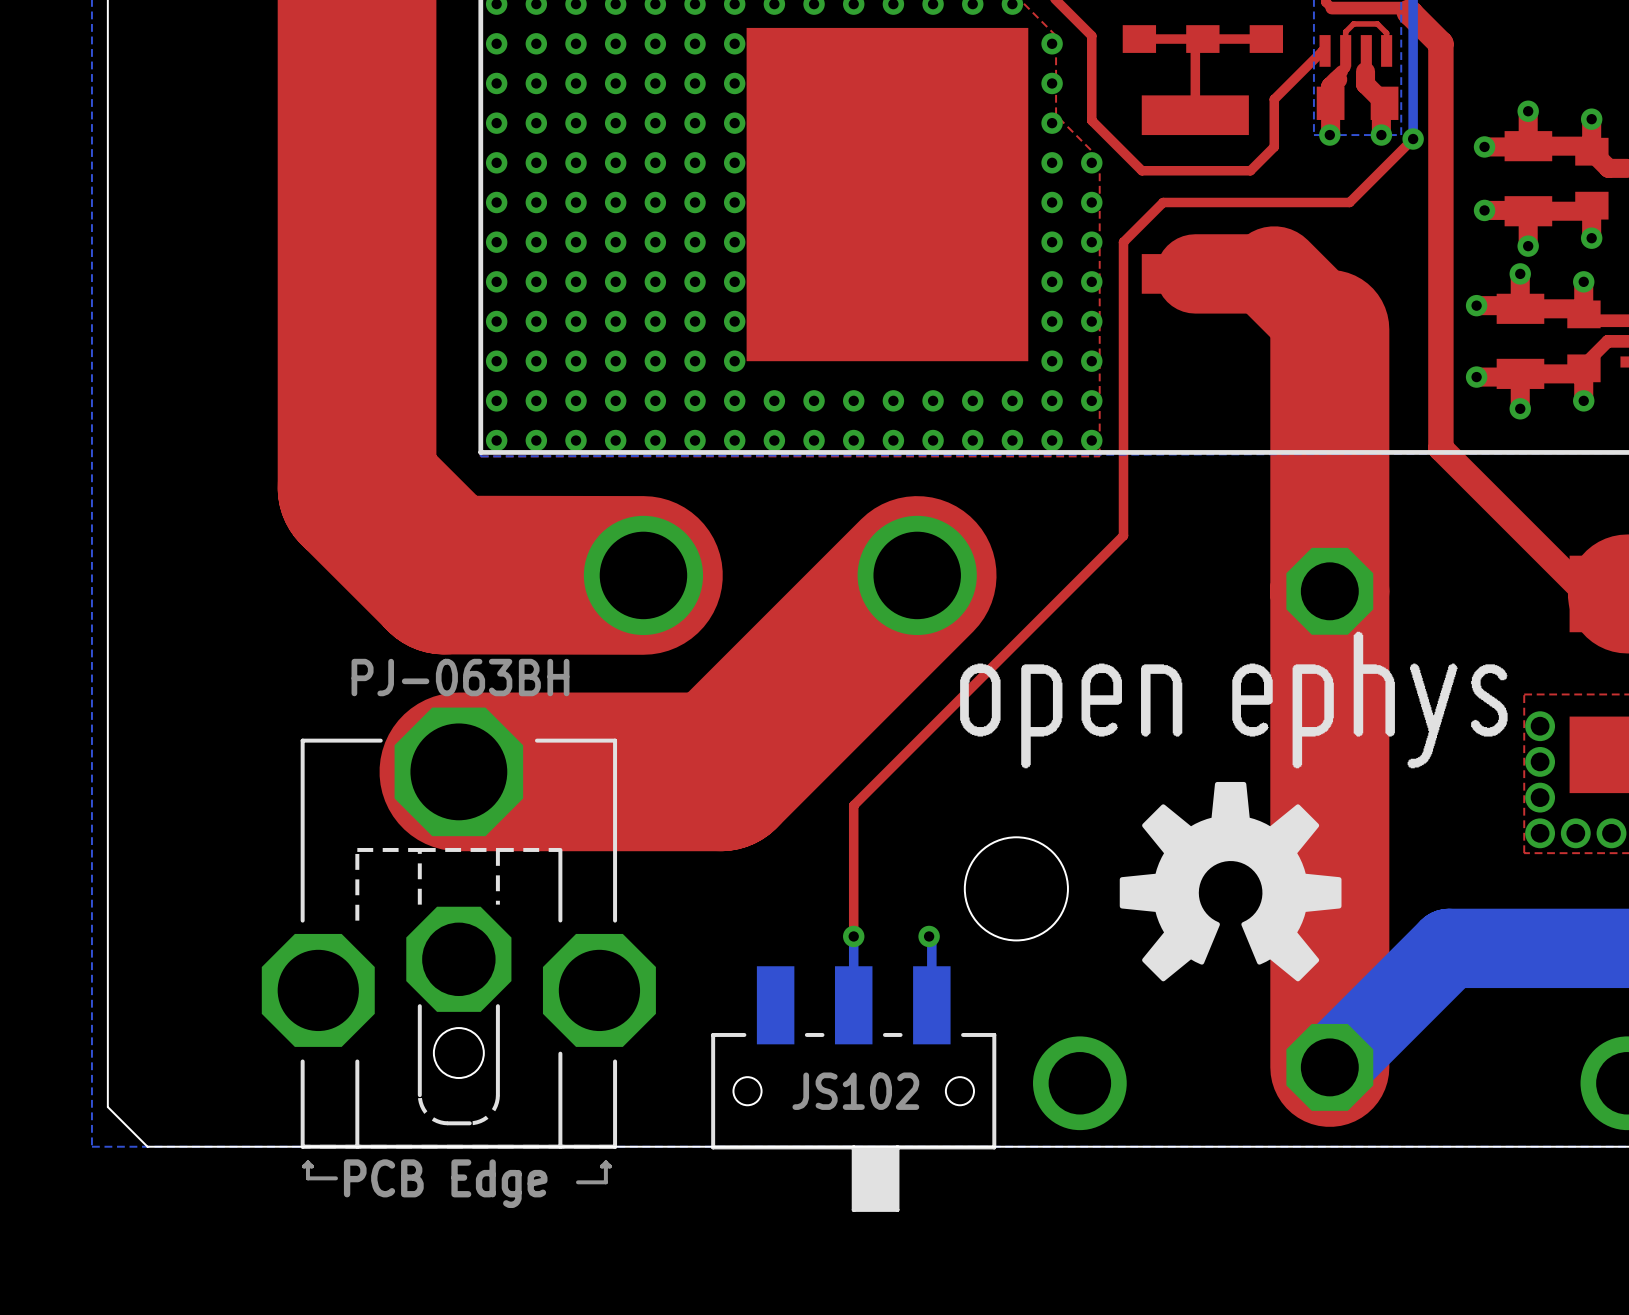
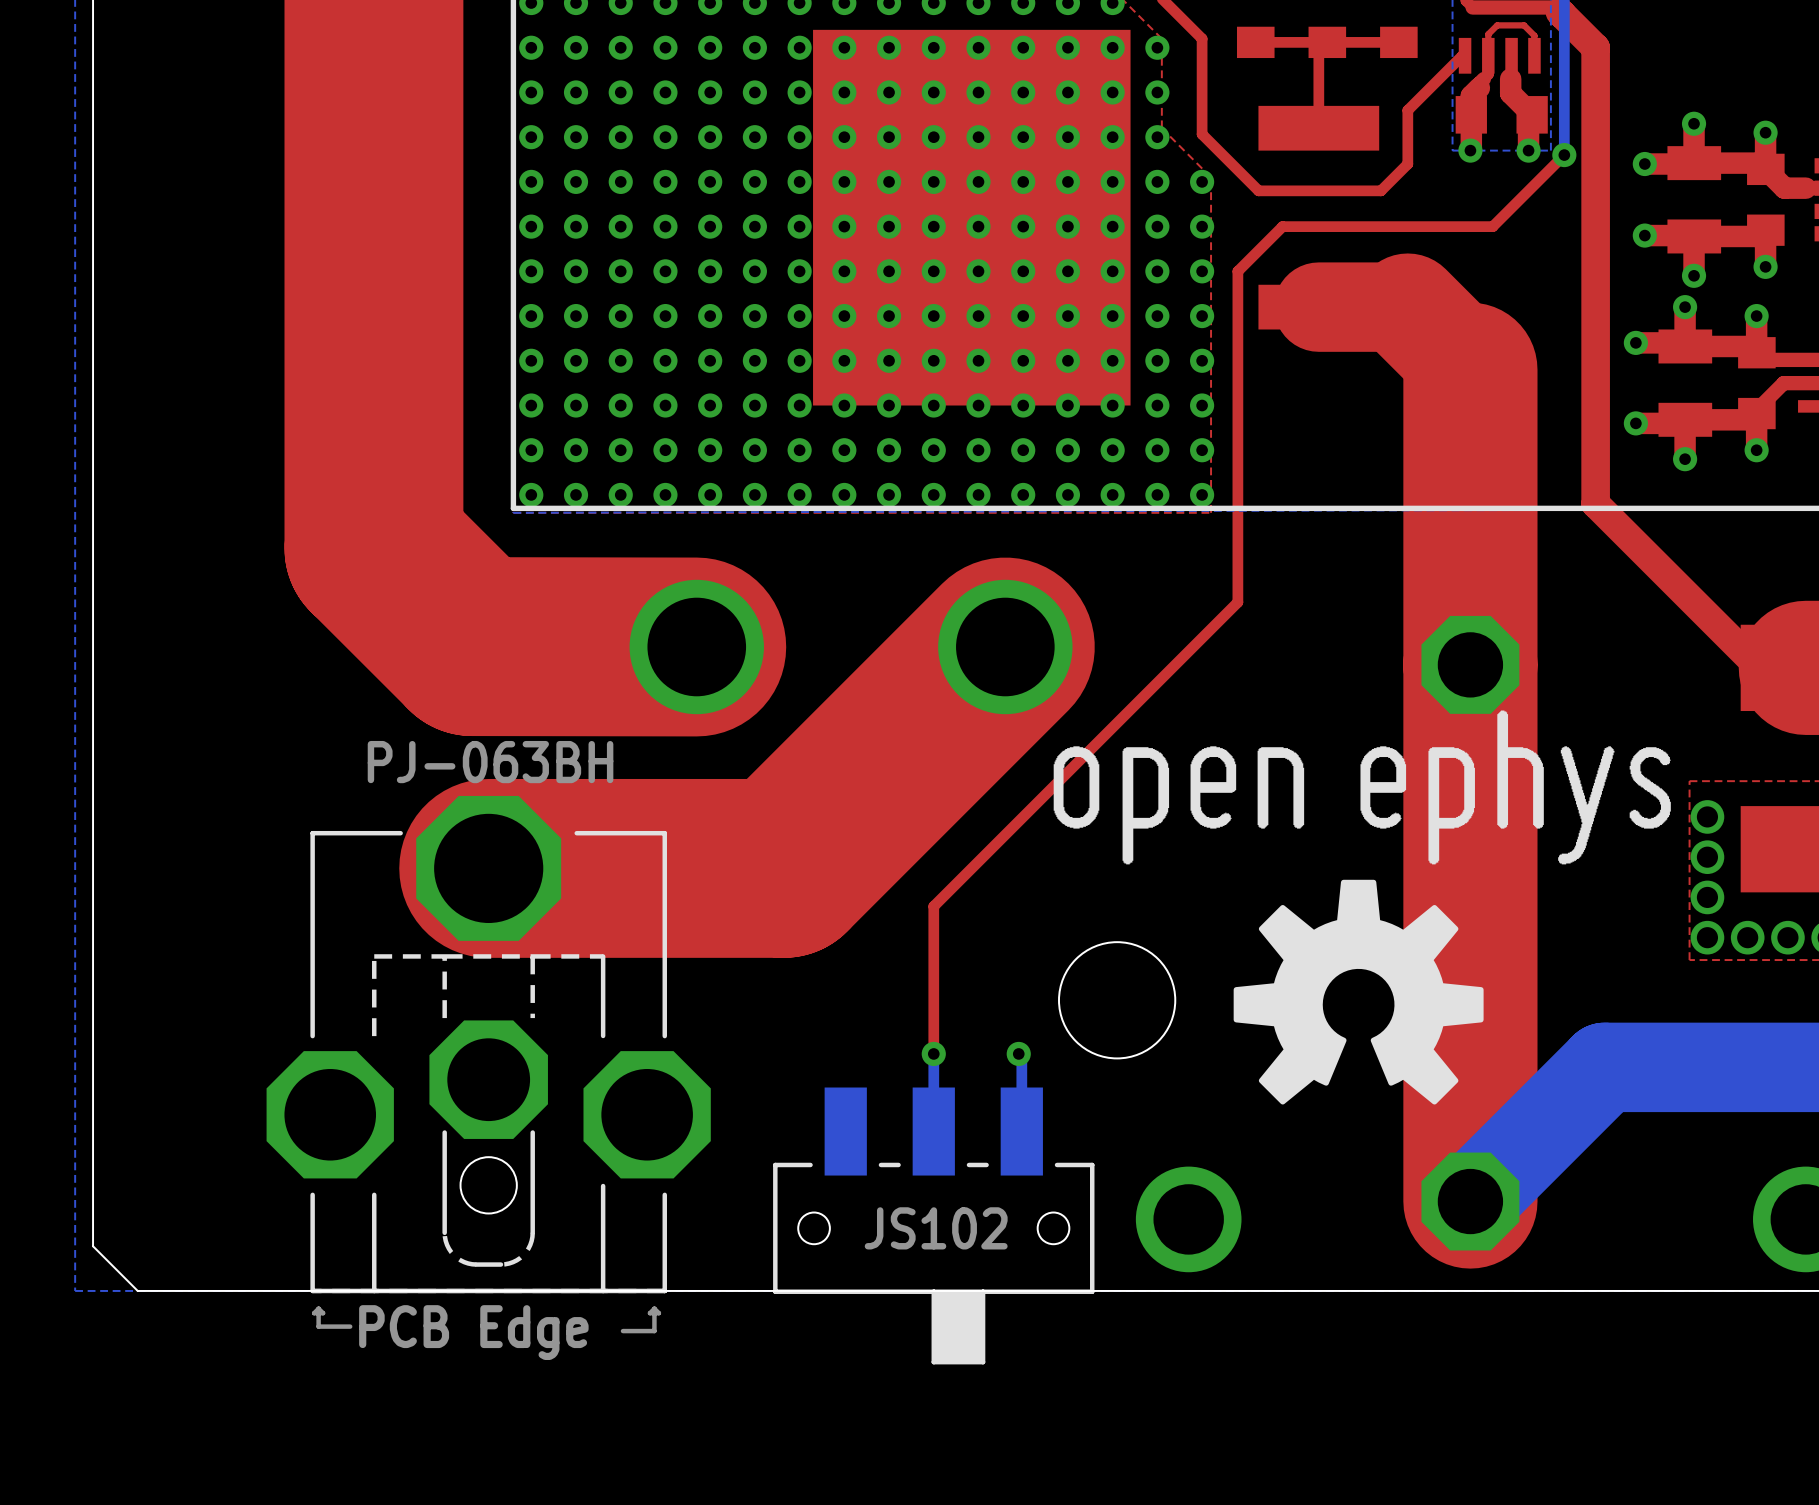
via: none -> (844, 47)
via: none -> (889, 47)
via: none -> (933, 47)
via: none -> (978, 47)
via: none -> (1023, 47)
via: none -> (1067, 47)
via: none -> (1112, 47)
via: none -> (844, 92)
via: none -> (889, 92)
via: none -> (933, 92)
via: none -> (978, 92)
via: none -> (1023, 92)
via: none -> (1067, 92)
via: none -> (1112, 92)
via: none -> (844, 137)
via: none -> (889, 137)
via: none -> (933, 137)
via: none -> (978, 137)
via: none -> (1023, 137)
via: none -> (1067, 137)
via: none -> (1112, 137)
via: none -> (844, 181)
via: none -> (889, 181)
via: none -> (933, 181)
via: none -> (978, 181)
via: none -> (1023, 181)
via: none -> (1067, 181)
via: none -> (1112, 181)
via: none -> (844, 226)
via: none -> (889, 226)
via: none -> (933, 226)
via: none -> (978, 226)
via: none -> (1023, 226)
via: none -> (1067, 226)
via: none -> (1112, 226)
via: none -> (844, 271)
via: none -> (889, 271)
via: none -> (933, 271)
via: none -> (978, 271)
via: none -> (1023, 271)
via: none -> (1067, 271)
via: none -> (1112, 271)
via: none -> (844, 316)
via: none -> (889, 316)
via: none -> (933, 316)
via: none -> (978, 316)
via: none -> (1023, 316)
via: none -> (1067, 316)
via: none -> (1112, 316)
via: none -> (844, 360)
via: none -> (889, 360)
via: none -> (933, 360)
via: none -> (978, 360)
via: none -> (1023, 360)
via: none -> (1067, 360)
via: none -> (1112, 360)
via: none -> (844, 405)
via: none -> (889, 405)
via: none -> (933, 405)
via: none -> (978, 405)
via: none -> (1023, 405)
via: none -> (1067, 405)
via: none -> (1112, 405)

